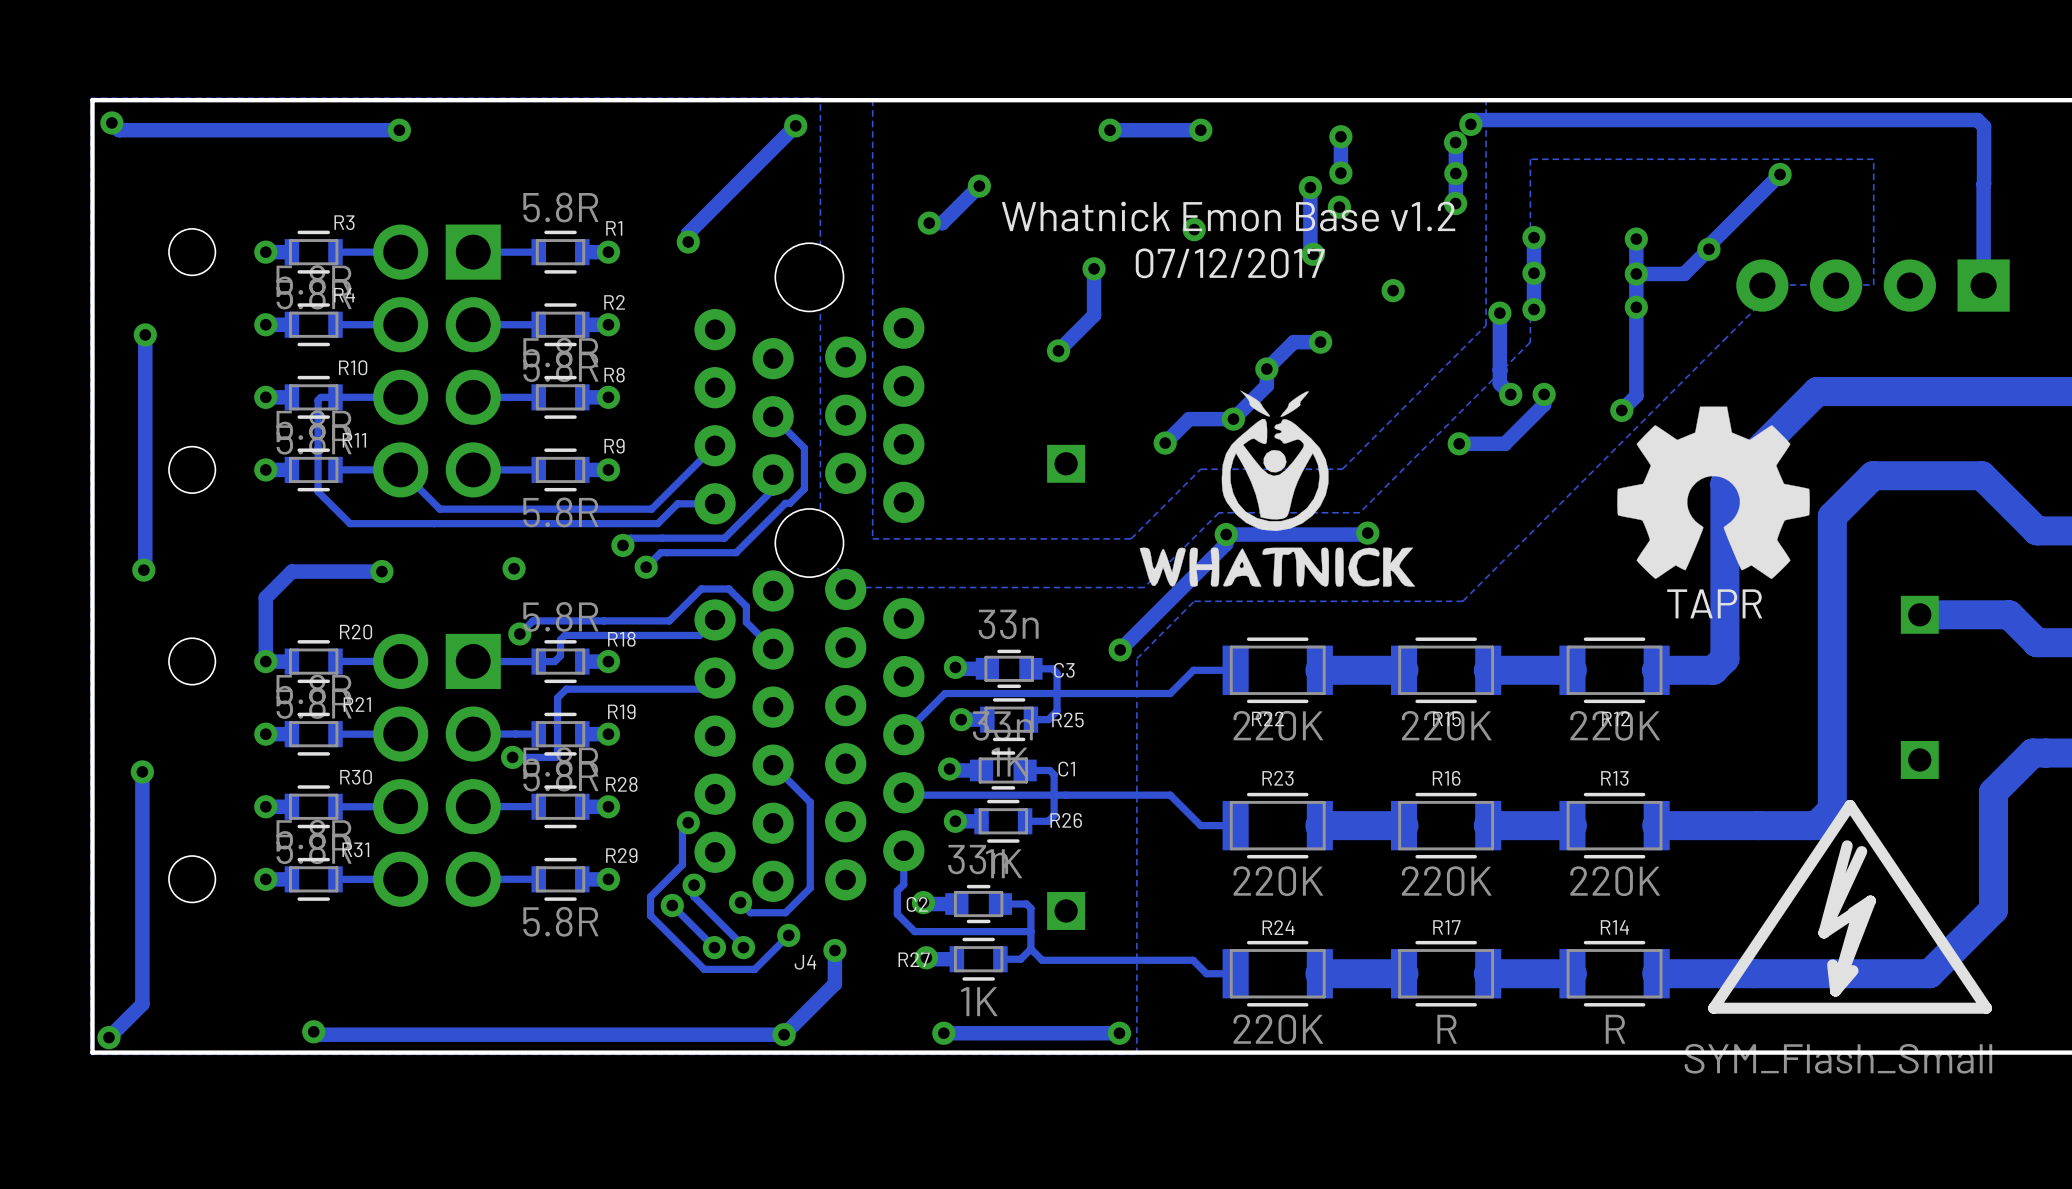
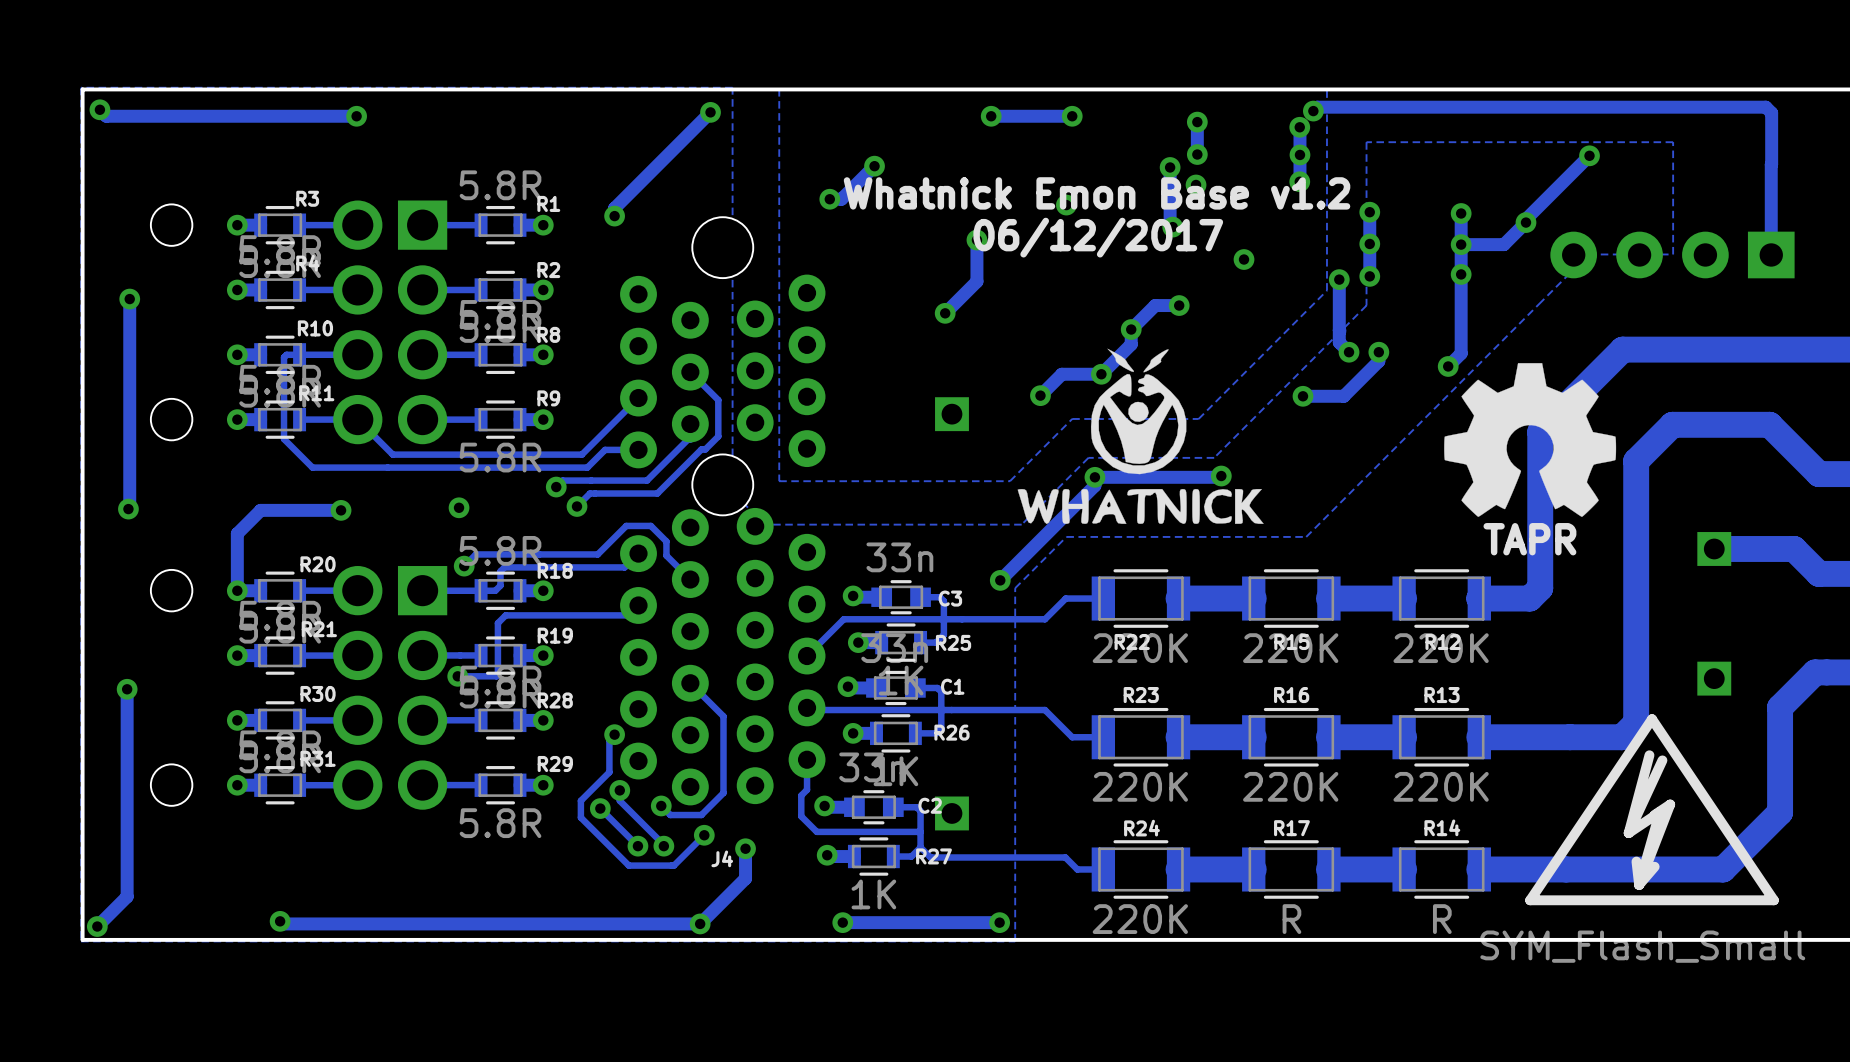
text: 07/12/2017 (1230, 263) -> 06/12/2017 (1098, 237)
C2 name position: C2 (917, 904) -> C2 (930, 805)
R27 name position: R27 (914, 959) -> R27 (934, 856)

